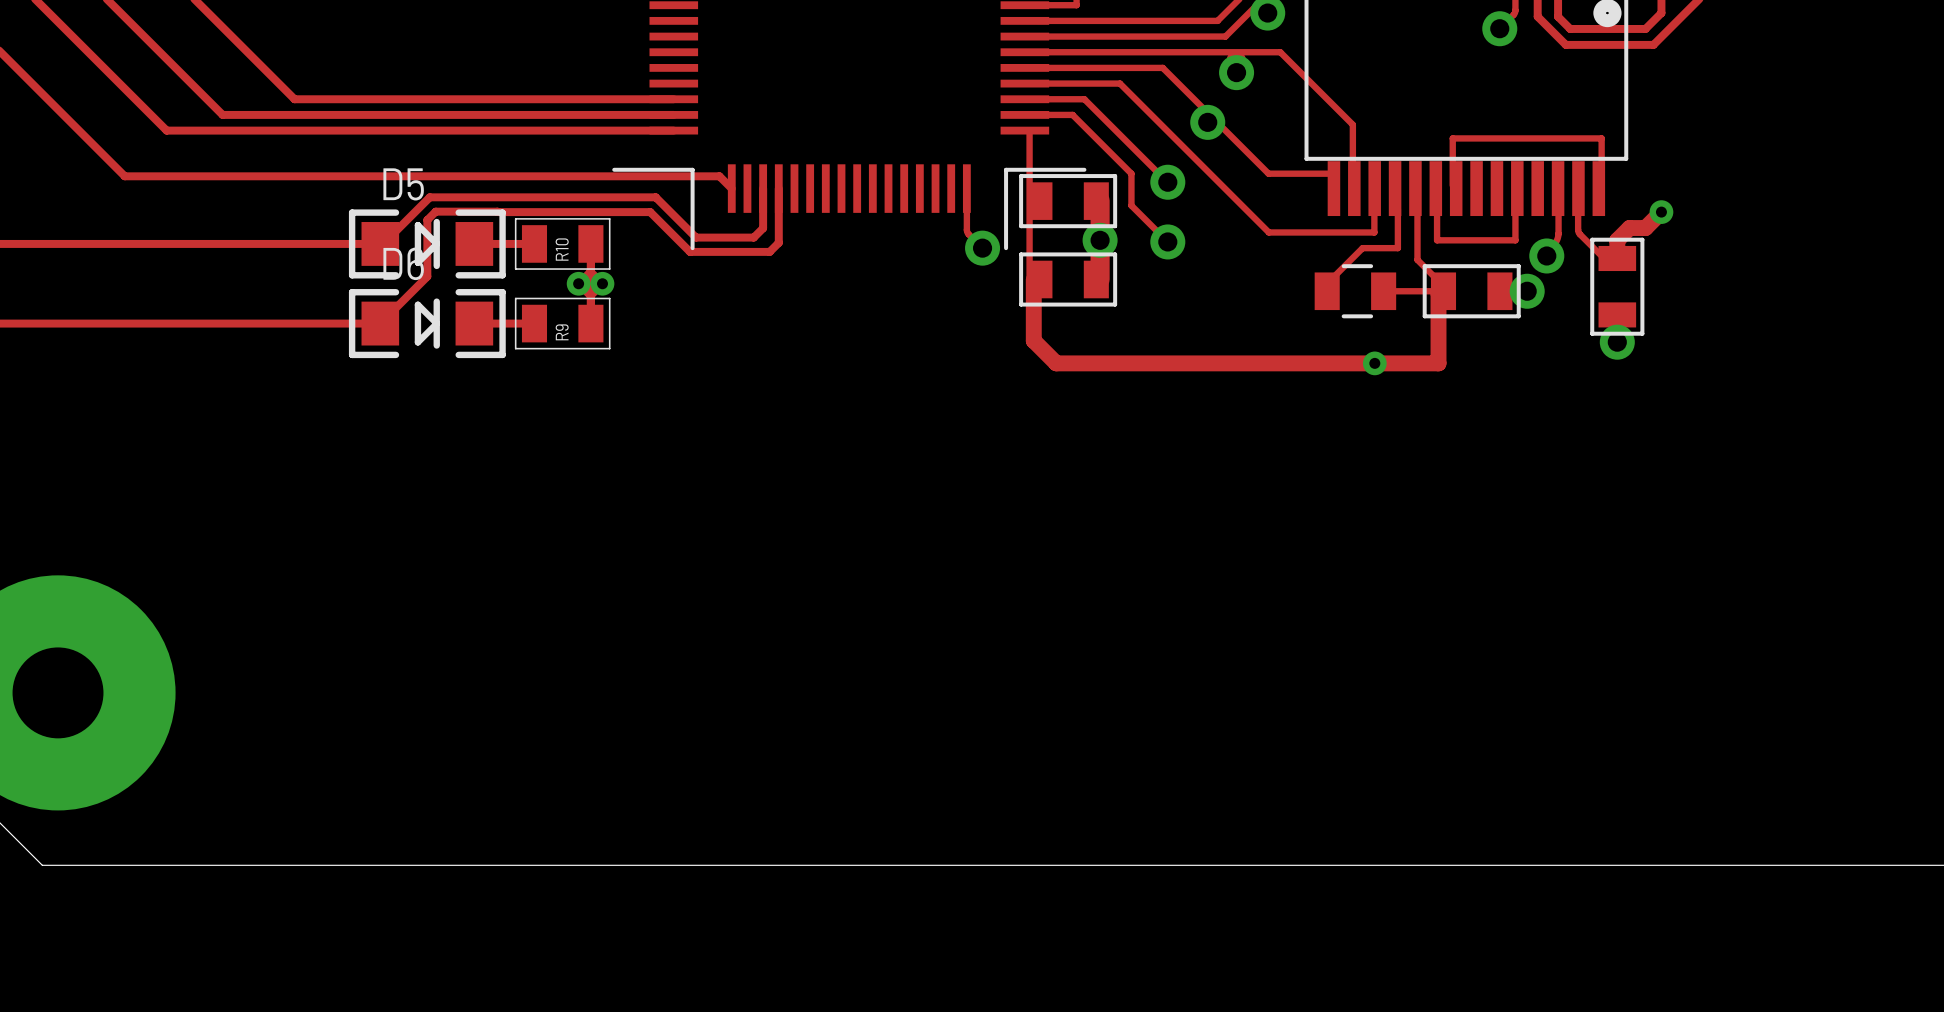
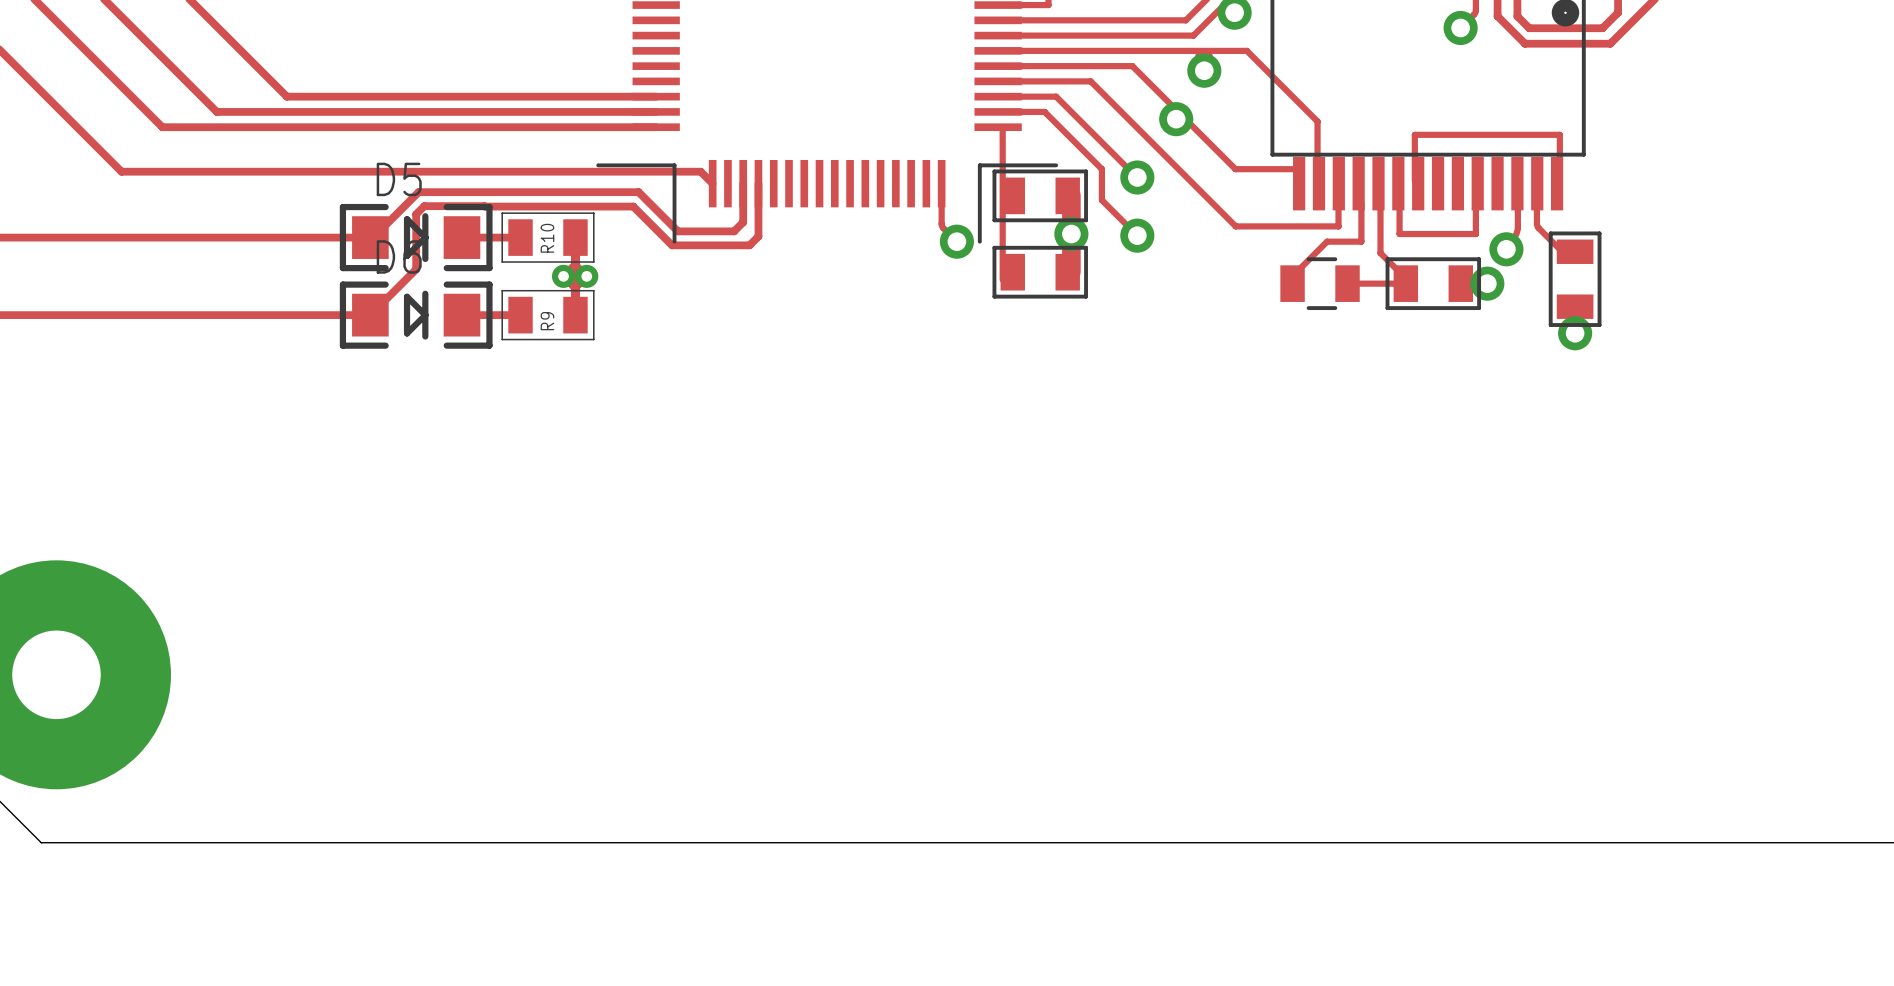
top track: (1661, 212) (1645, 228) (1629, 228) (1617, 240) (1617, 252) -> none
via: (1661, 212) -> none
top track: (1033, 279) (1033, 340) (1056, 363) (1438, 363) (1438, 293) (1440, 291) -> none
via: (1374, 363) -> none

